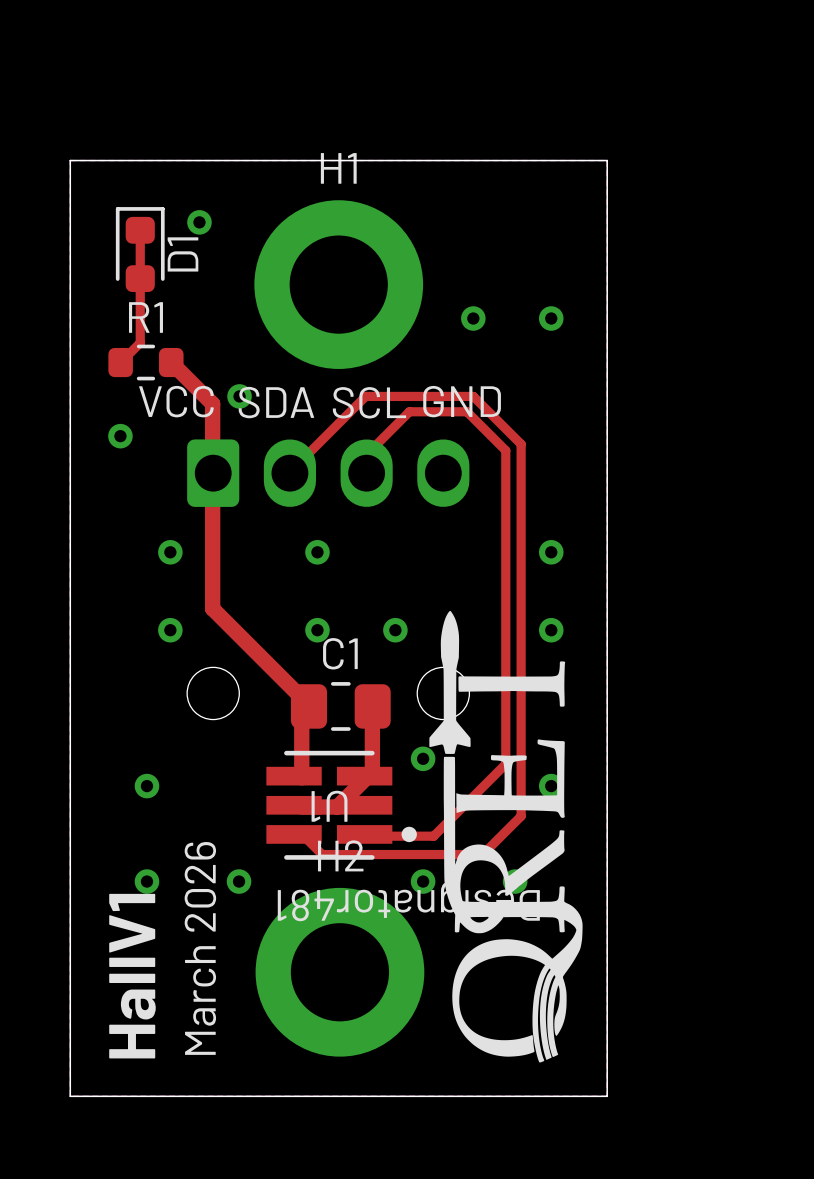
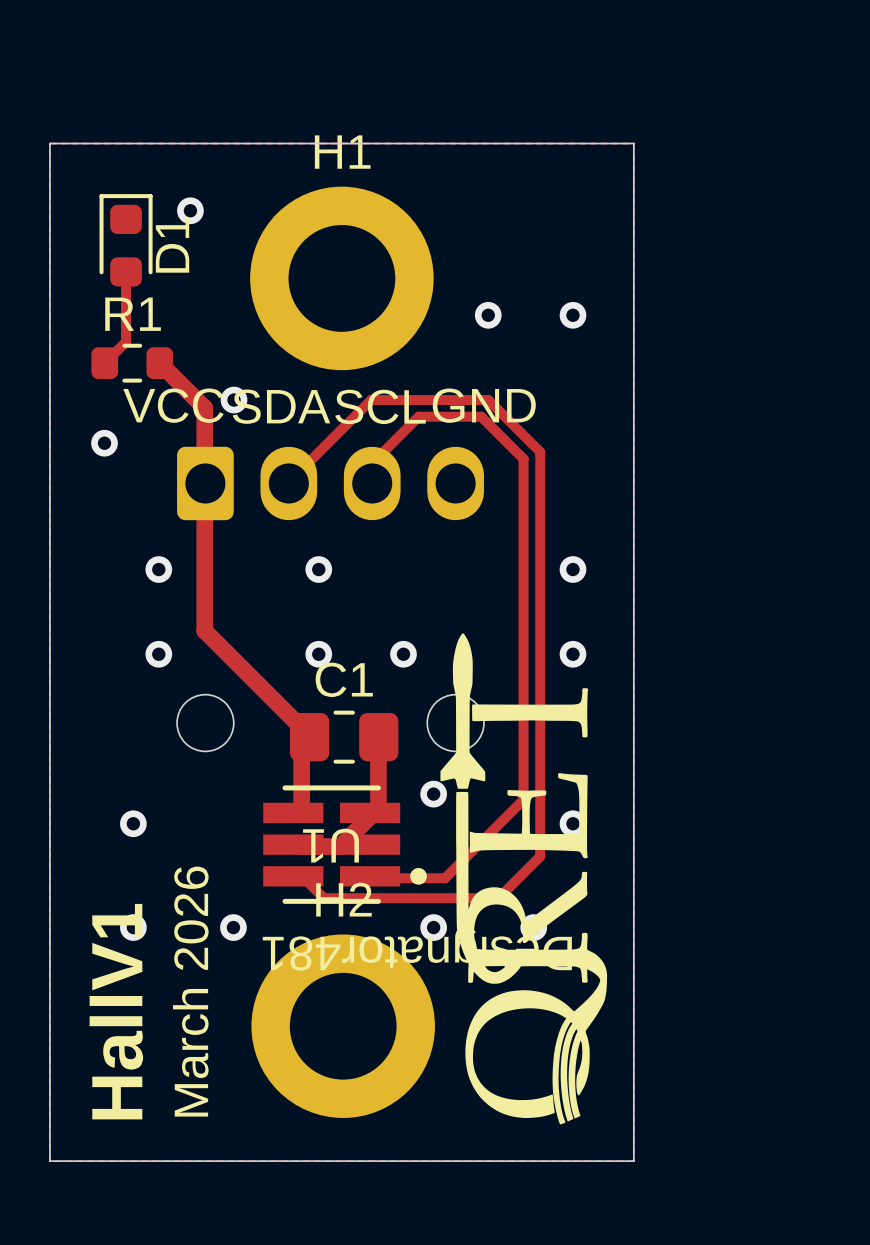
top track: (140, 230) (140, 278) -> none

